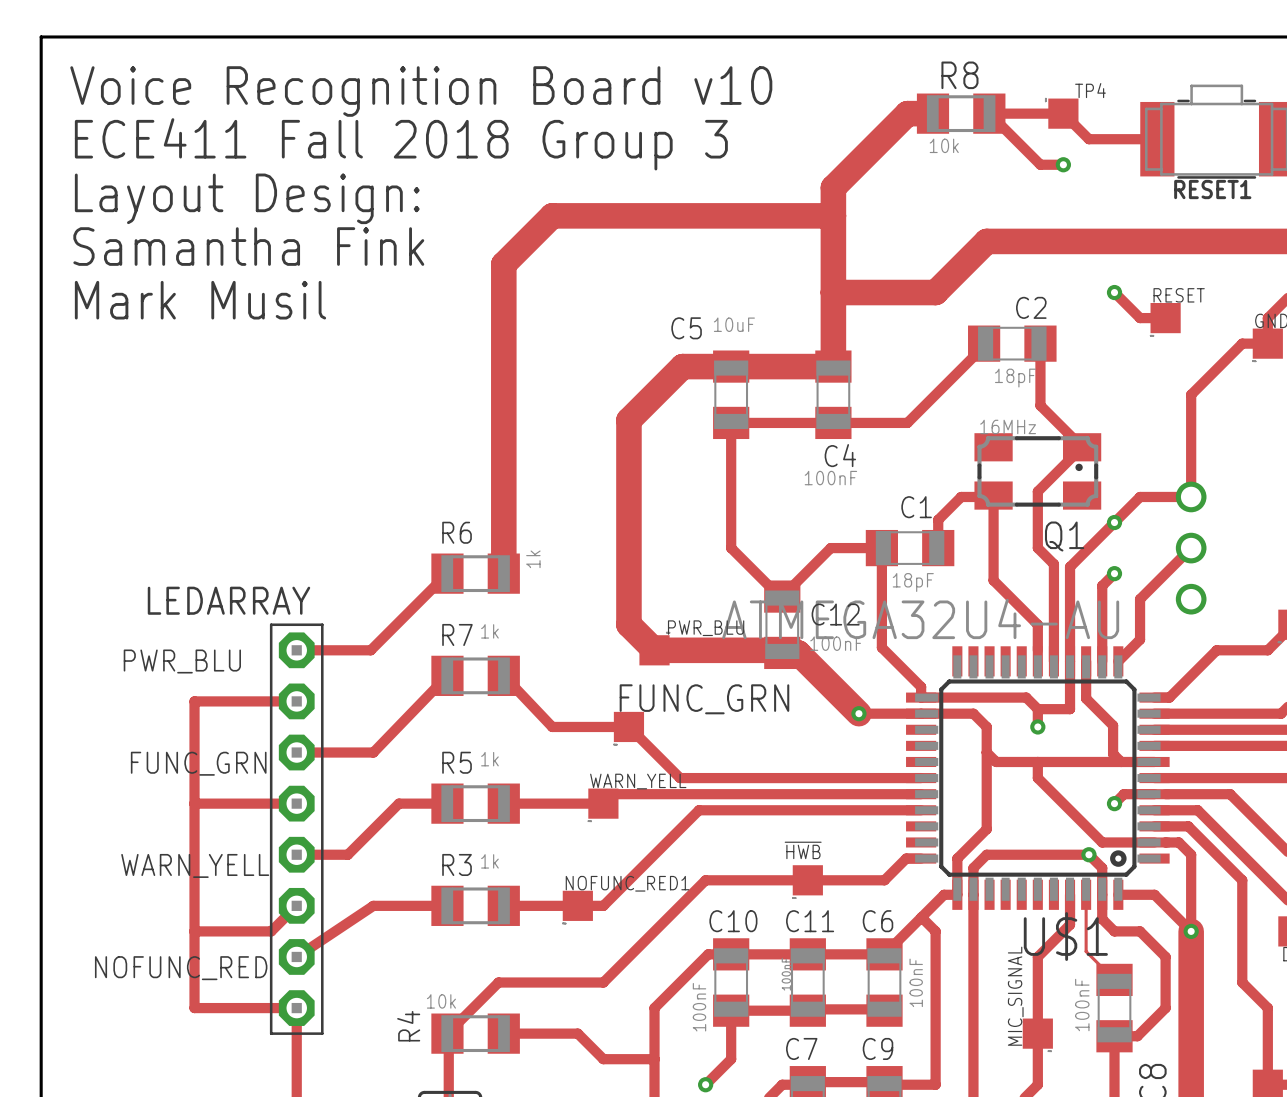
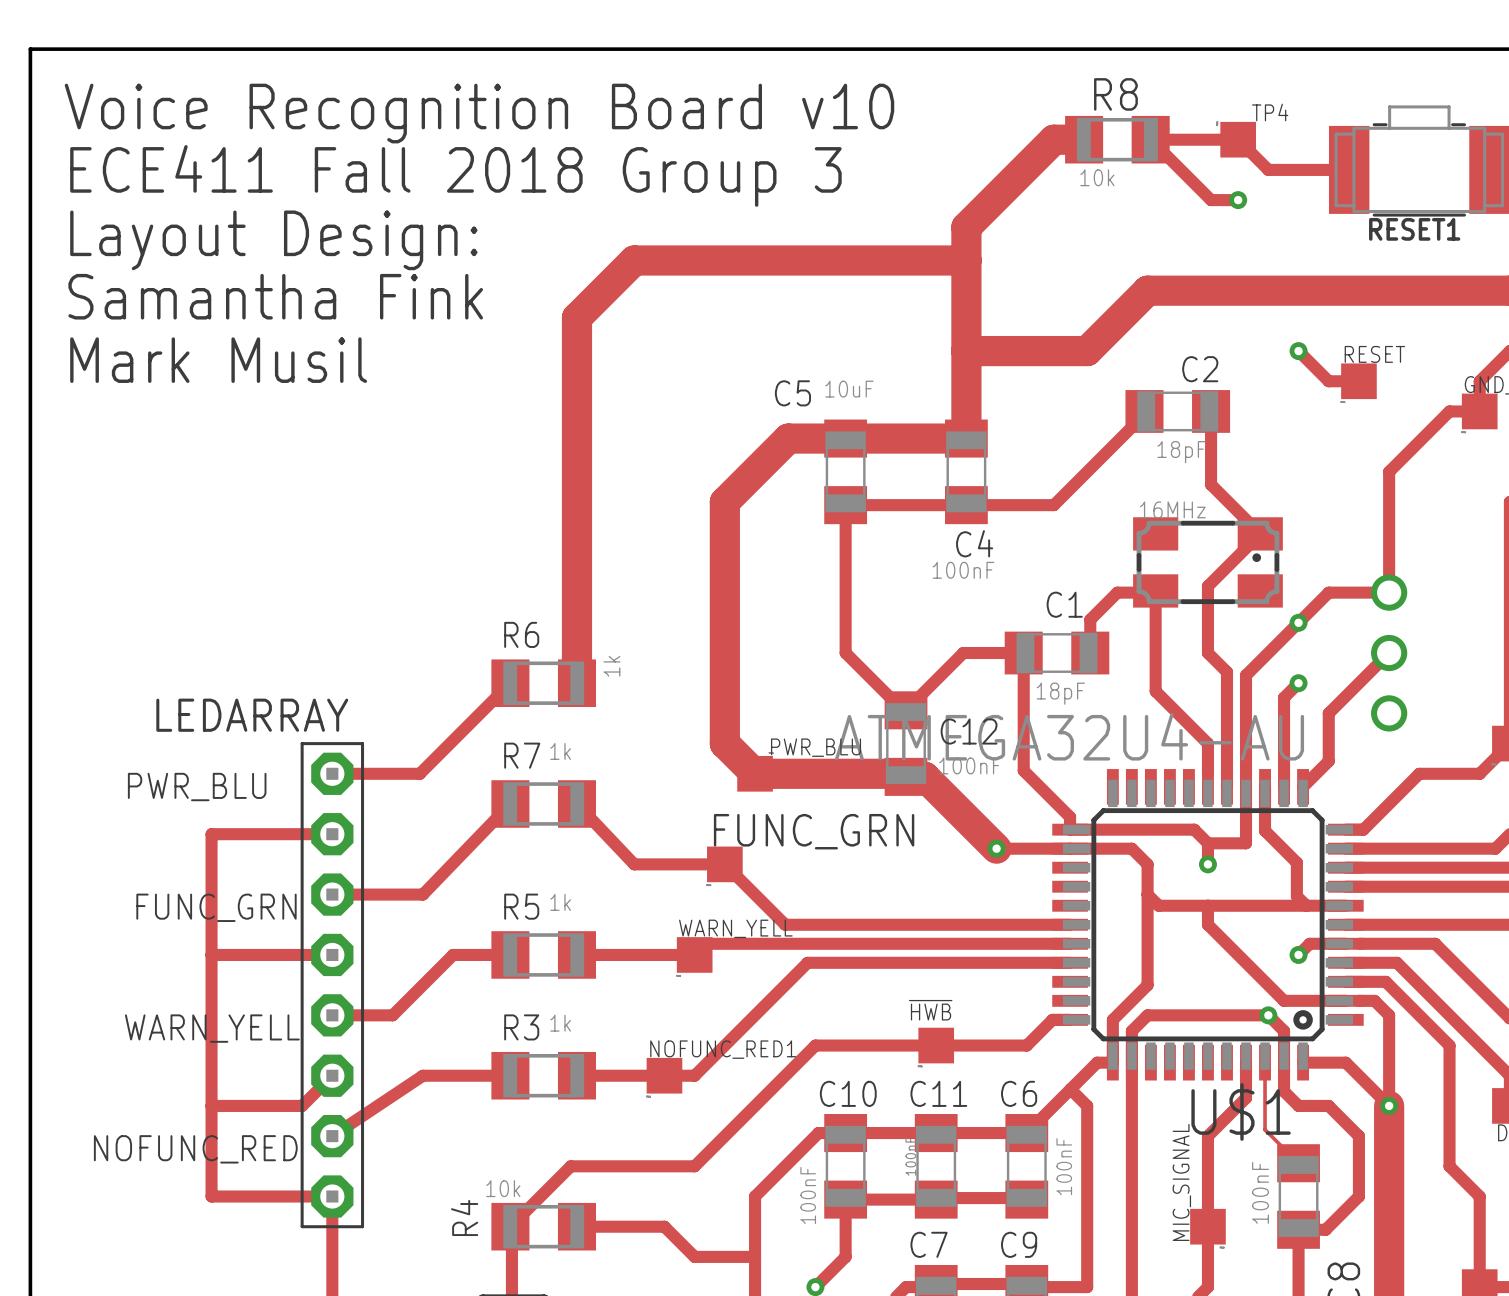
Q1 name: Q1 (1064, 536) -> none

